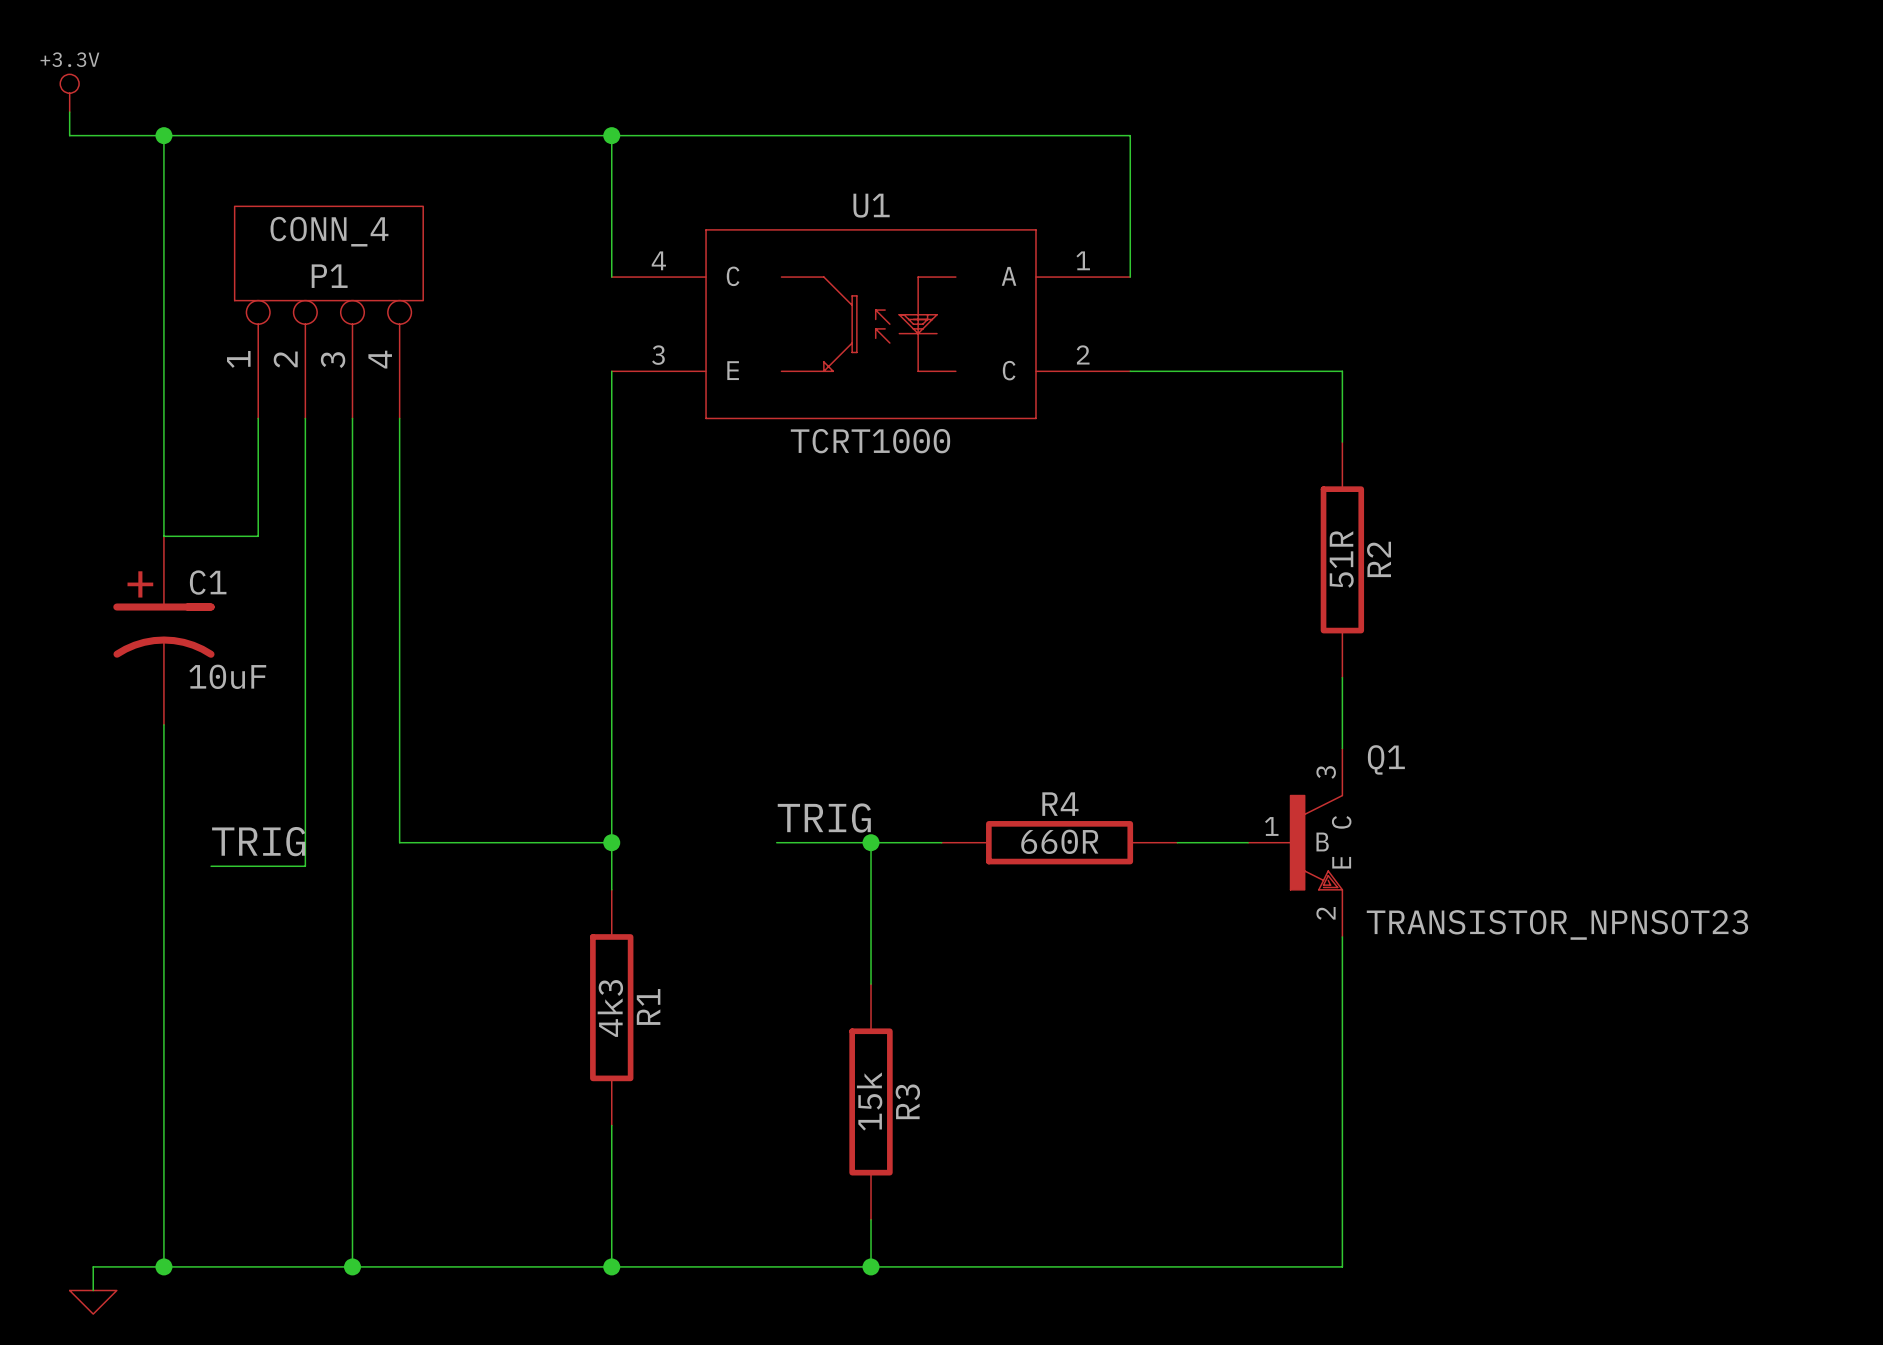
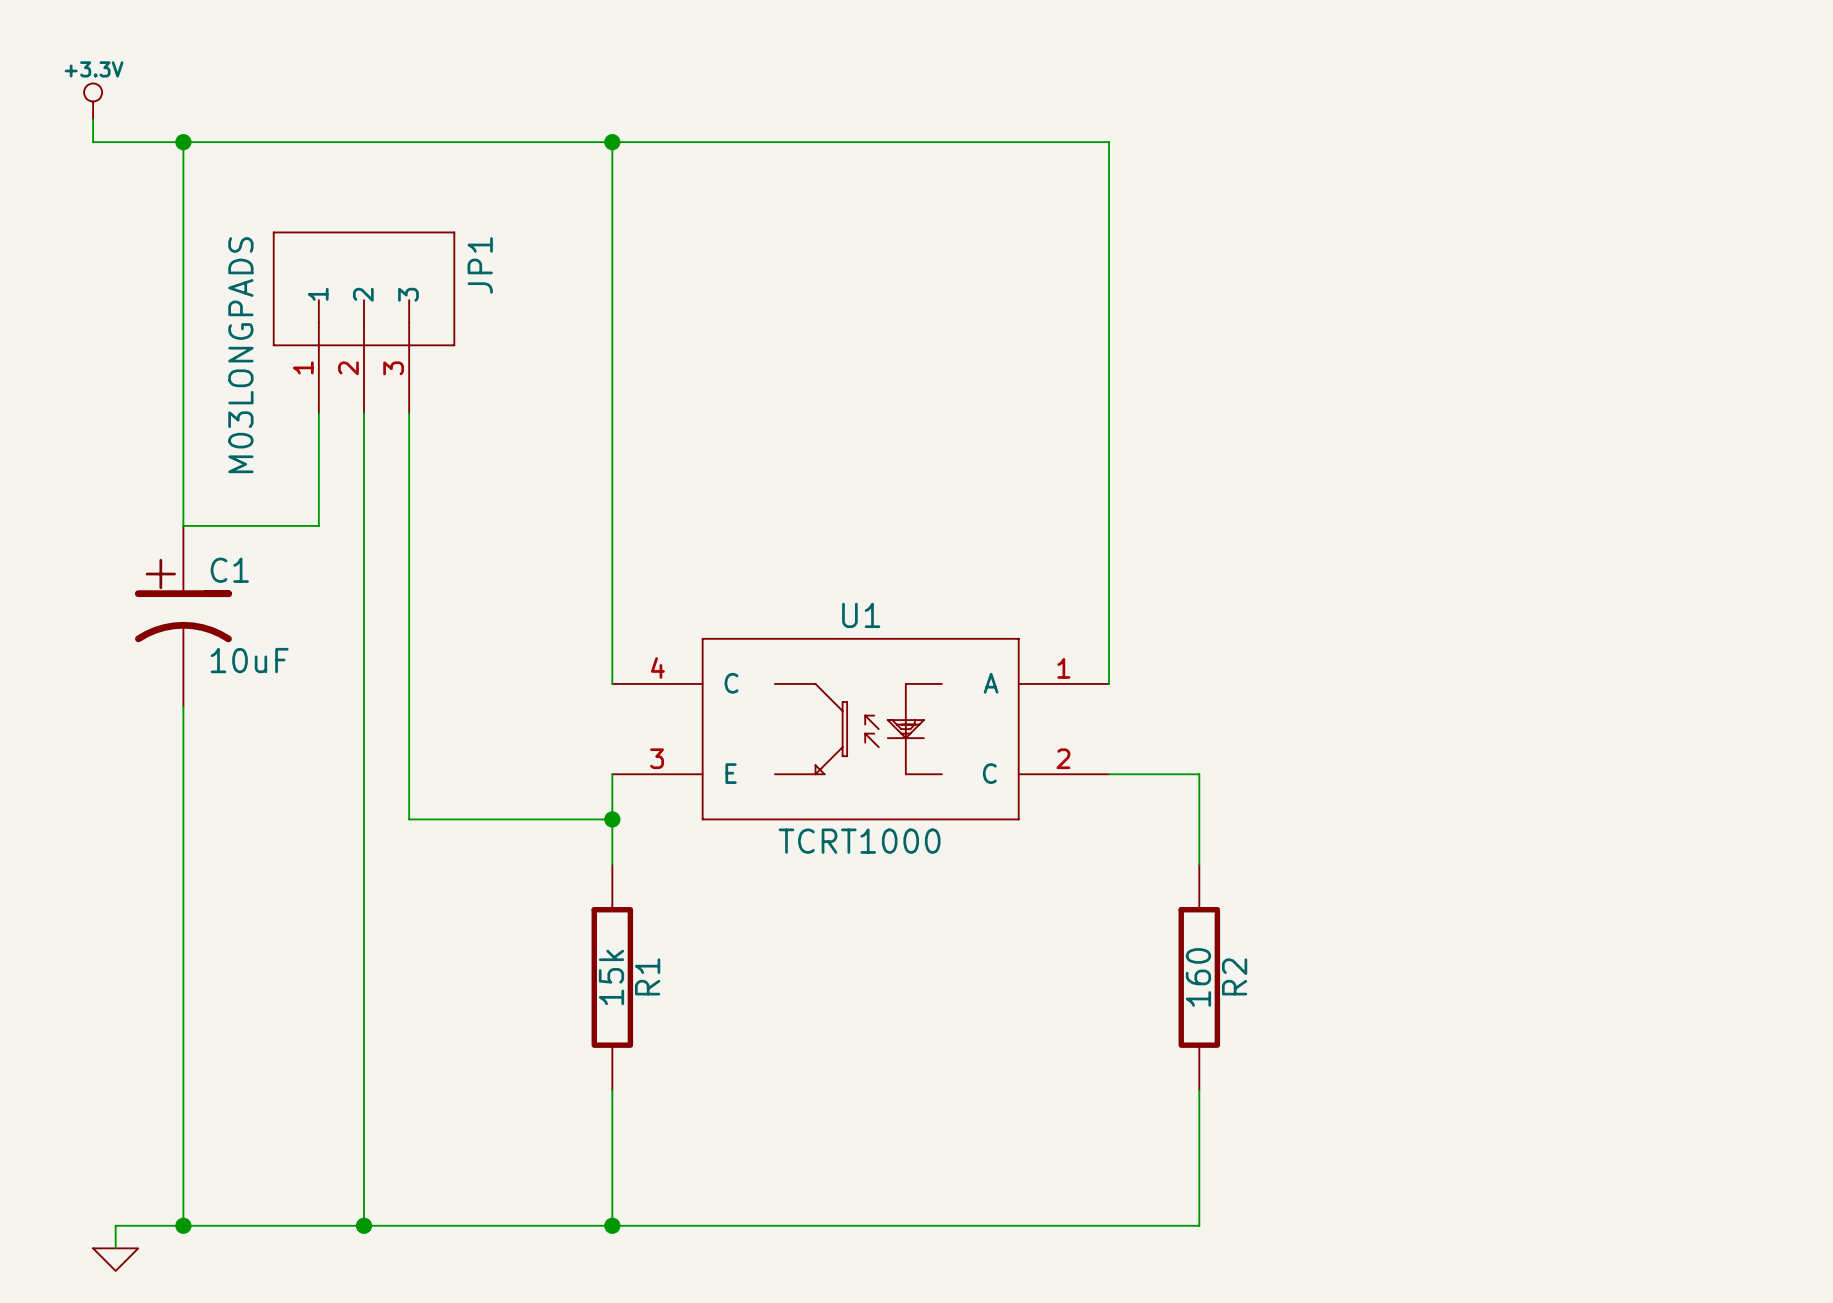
wire: none -> (1109, 277) (1109, 683)
P1: CONN_4 (328, 312) -> none
JP1: none -> M03LONGPADS (364, 322)
U1 position: (871, 324) -> (860, 729)
wire: (1130, 371) (1342, 371) (1342, 442) -> none
wire: (258, 418) (258, 536) -> (318, 525) (273, 525)
wire: (305, 536) (305, 866) (211, 866) -> none
R2 value: 51R (1341, 559) -> 160 (1198, 977)
R2 position: (1342, 559) -> (1199, 977)
wire: (1342, 677) (1342, 748) -> none
wire: (611, 701) (611, 795) -> (612, 277) (612, 367)
wire: none -> (1109, 774) (1199, 774) (1199, 864)
label: TRIG (824, 818) -> none
label: TRIG (258, 841) -> none
wire: (871, 842) (871, 984) -> none
junction: (871, 842) -> none
R4: 660R (1059, 842) -> none
wire: (1177, 842) (1248, 842) -> none
Q1: TRANSISTOR_NPNSOT23 (1295, 842) -> none
wire: (1342, 936) (1342, 1266) (1224, 1266) -> (1199, 1090) (1199, 1225)
R1 value: 4k3 (610, 1008) -> 15k (611, 977)
R3: 15k (871, 1101) -> none
wire: (871, 1219) (871, 1266) -> none
junction: (871, 1266) -> none

